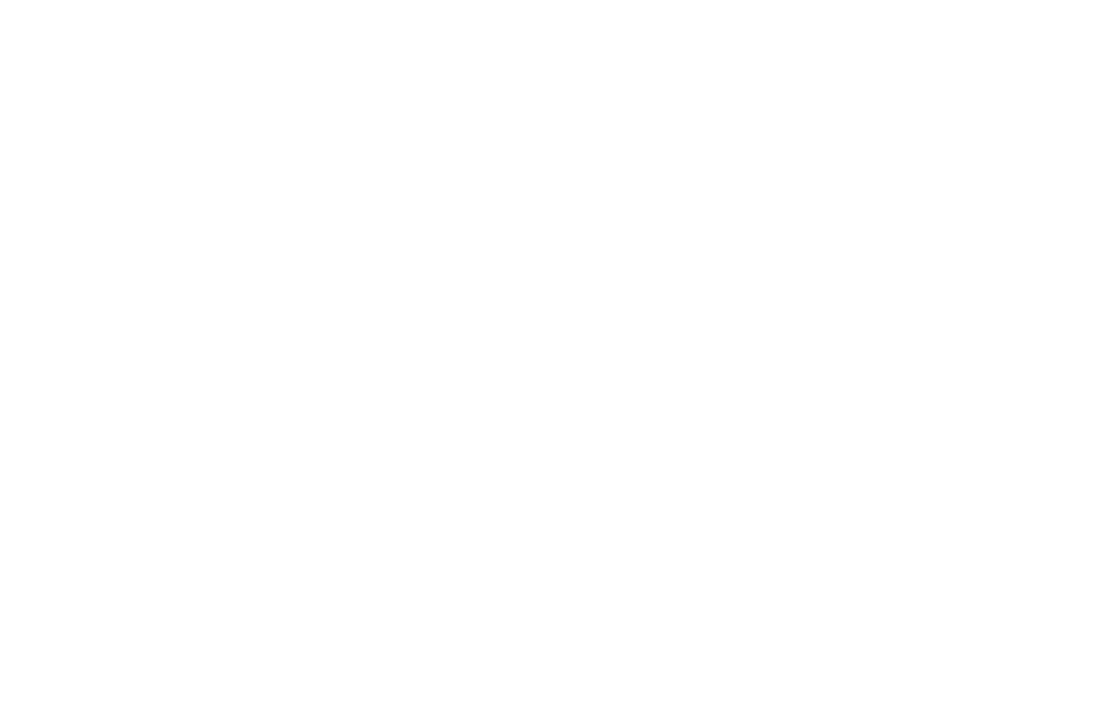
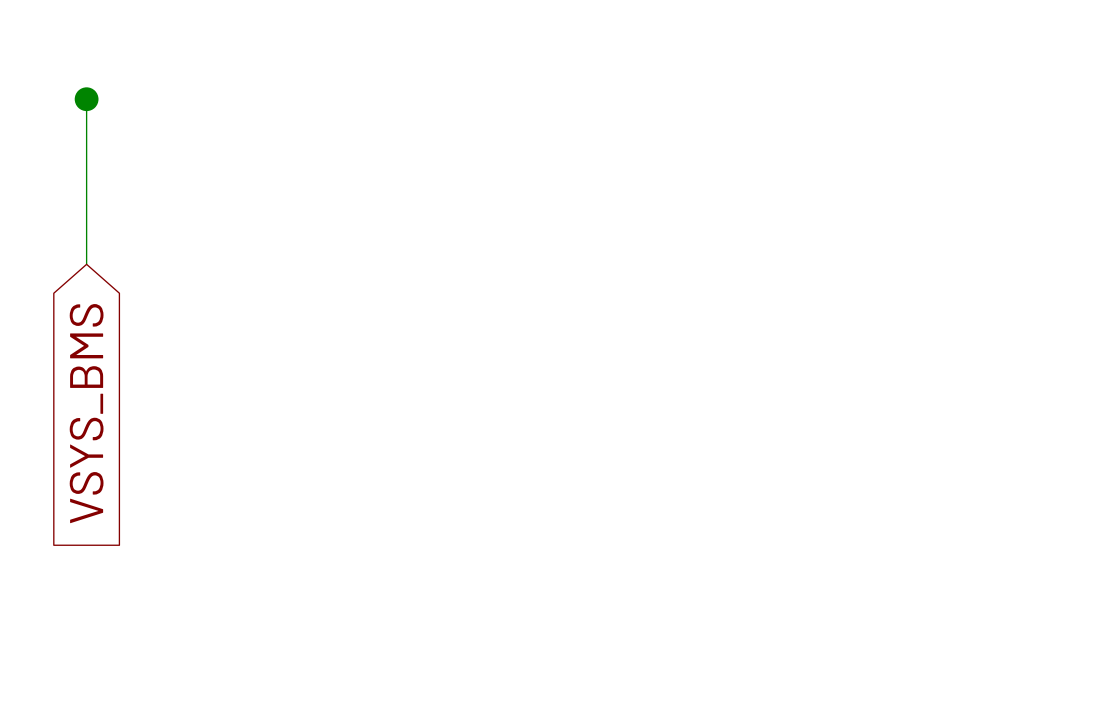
wire: none -> (86, 99) (86, 264)
junction: none -> (86, 99)
global label: none -> VSYS_BMS (86, 413)

